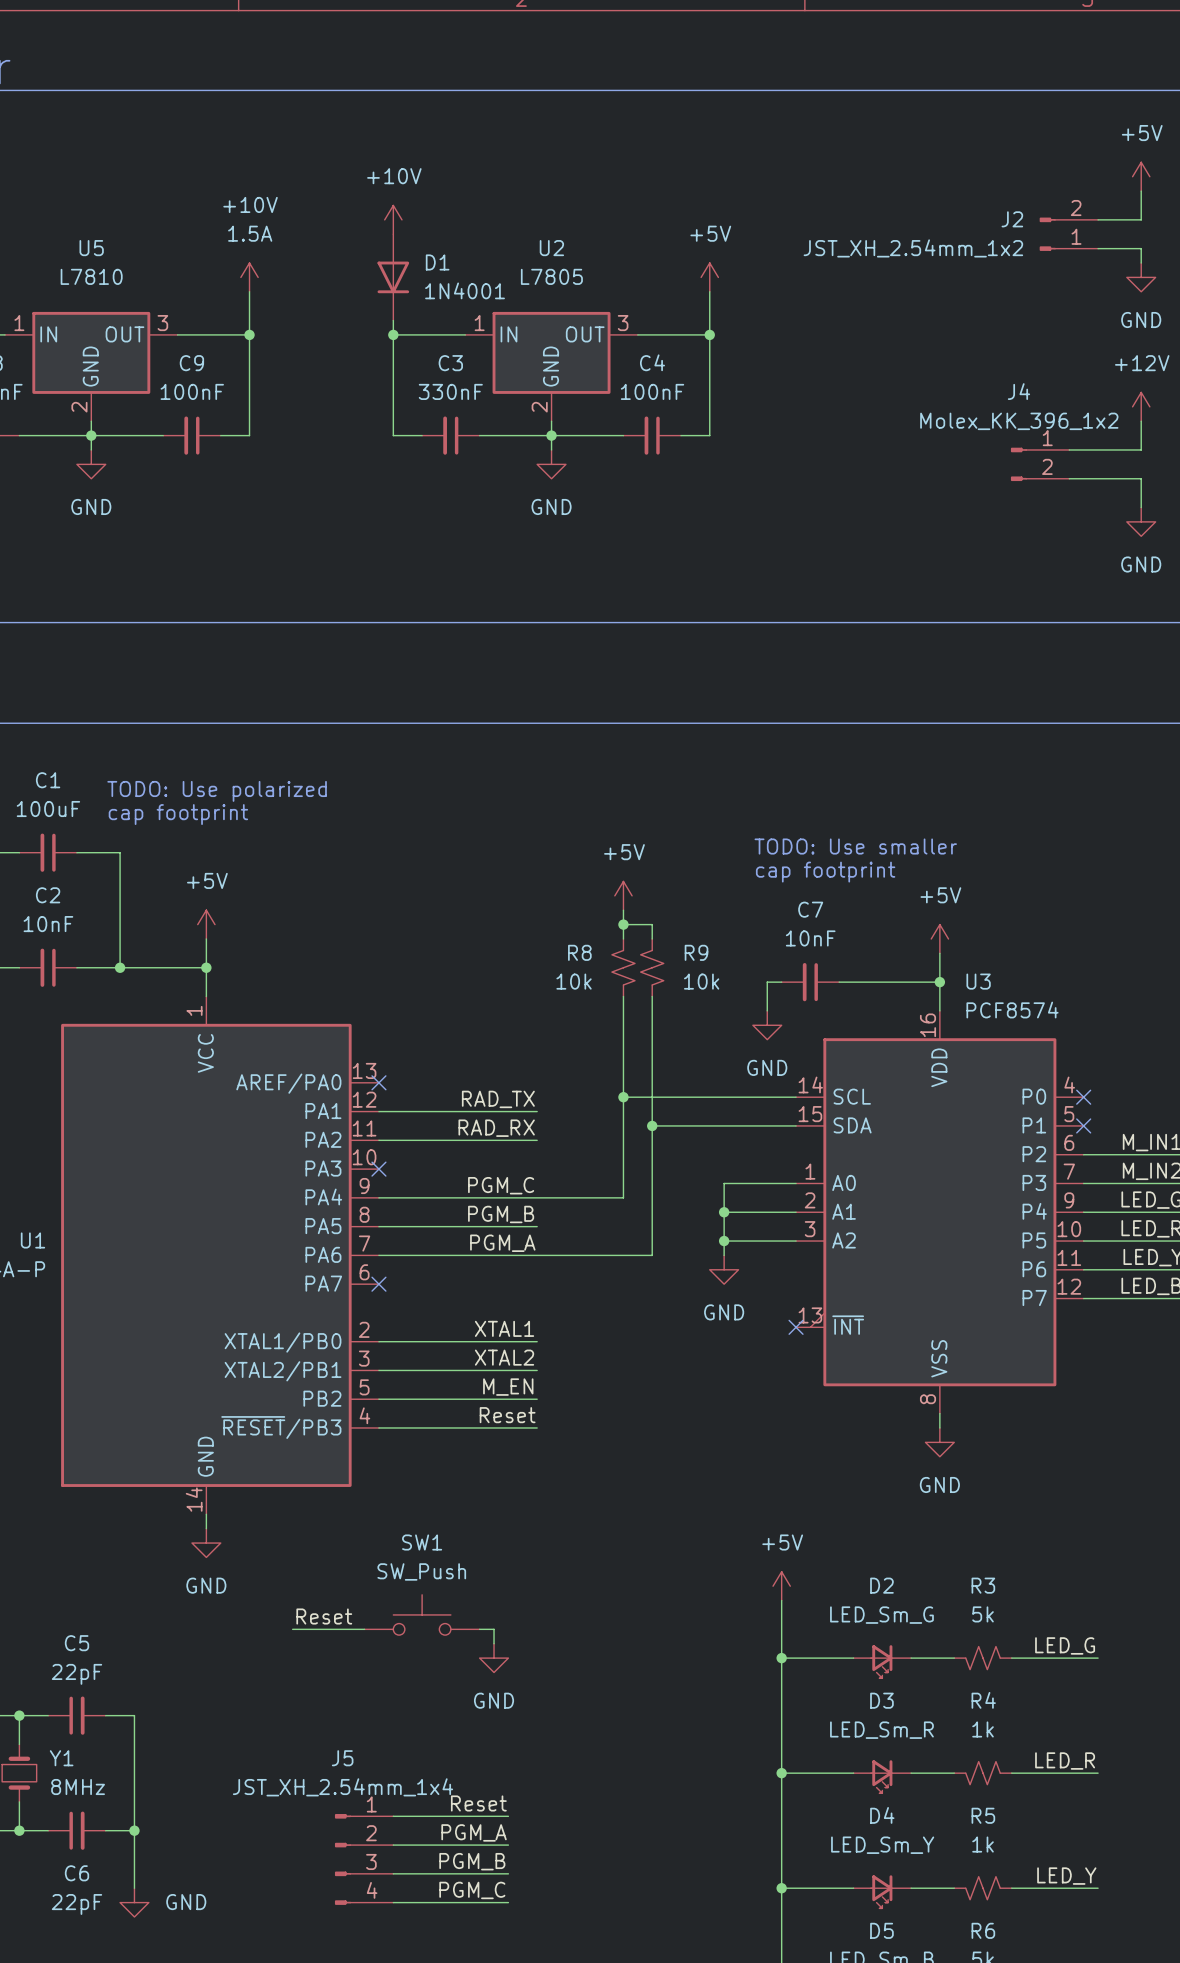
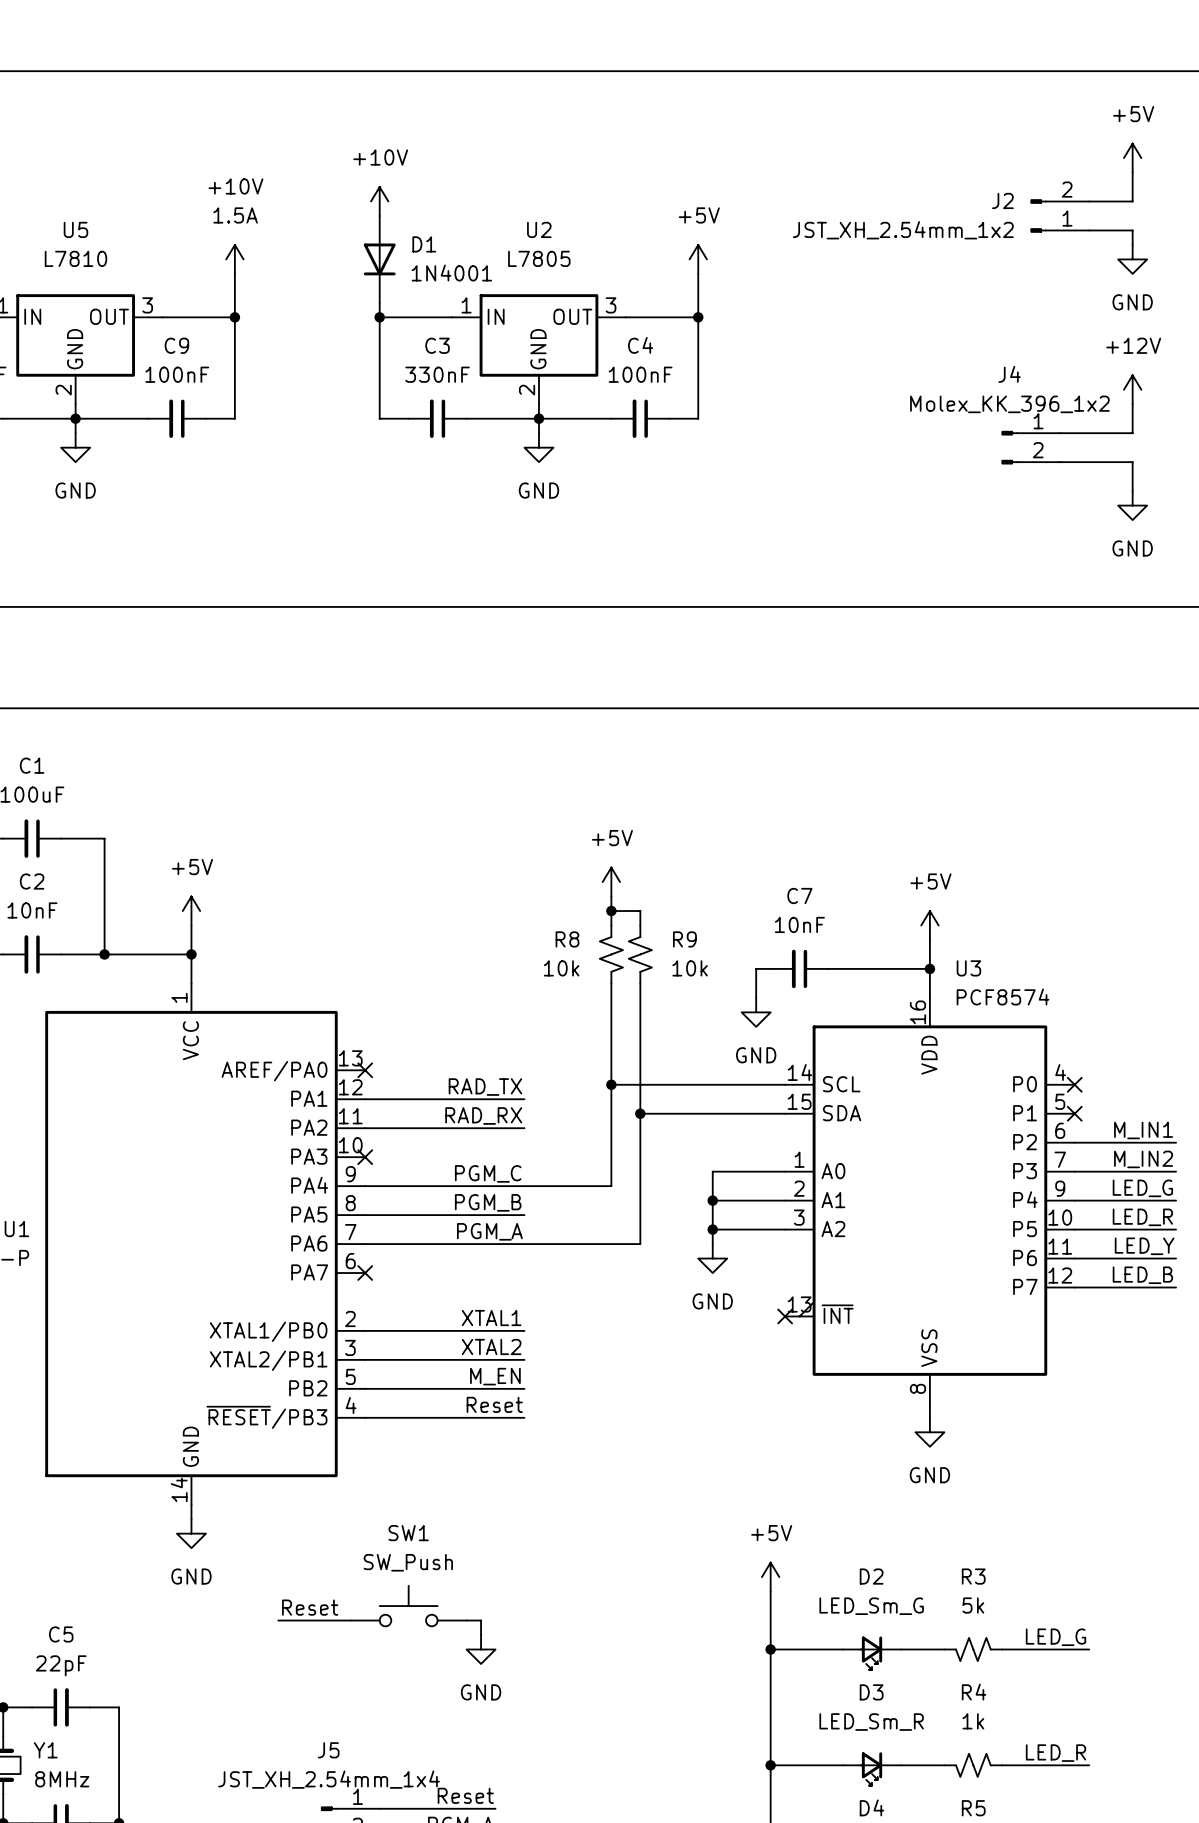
text: TODO: Use polarized (217, 791) -> none
text: cap footprint (178, 814) -> none
text: TODO: Use smaller (855, 846) -> none
text: cap footprint (825, 872) -> none

